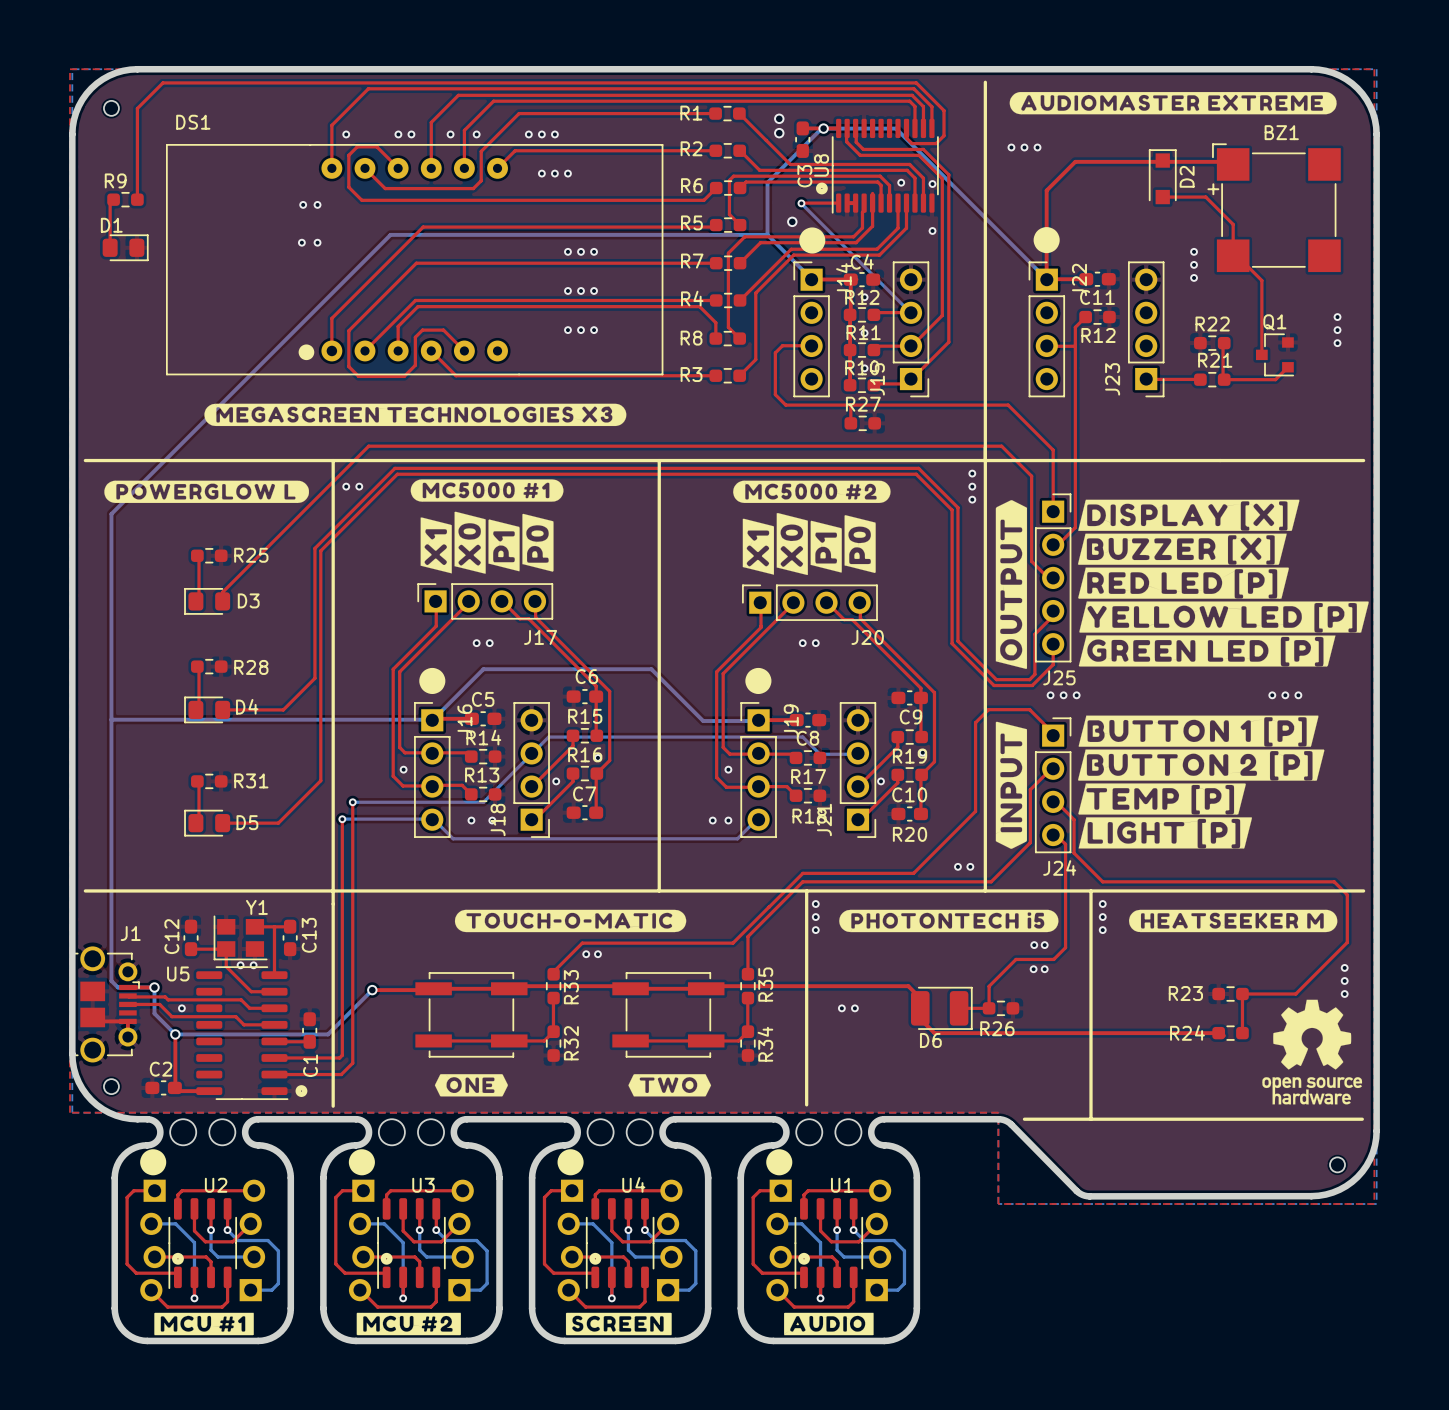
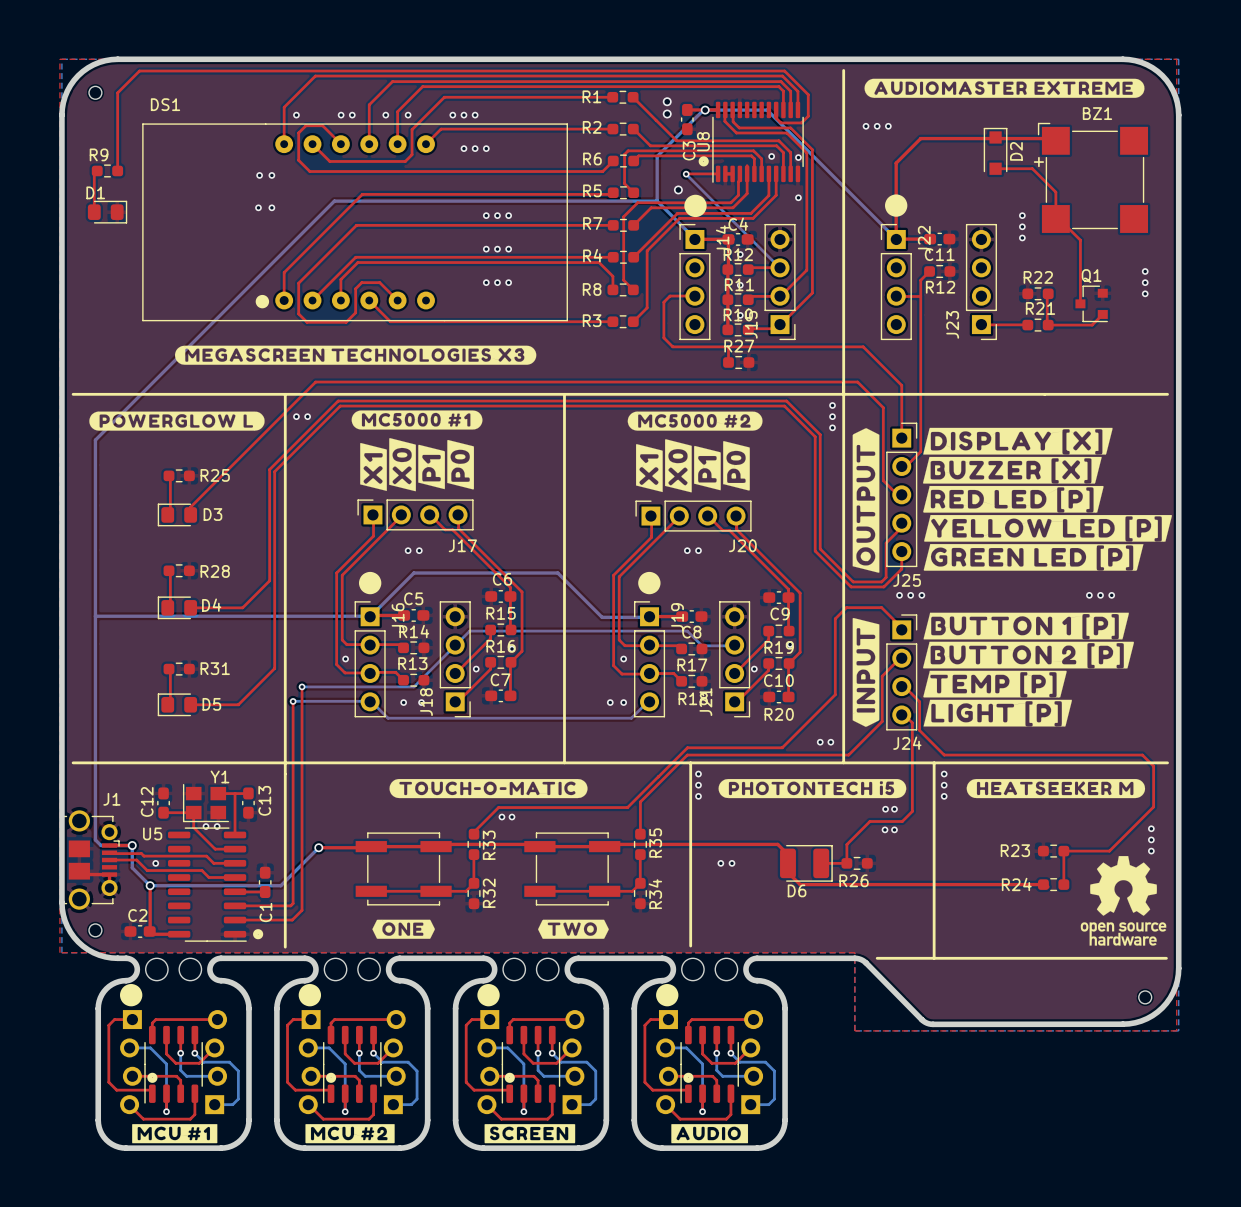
U4 name: U4 (633, 1184) -> none
U2 name: U2 (216, 1185) -> none
U3 name: U3 (423, 1185) -> none
U1 name: U1 (842, 1185) -> none

